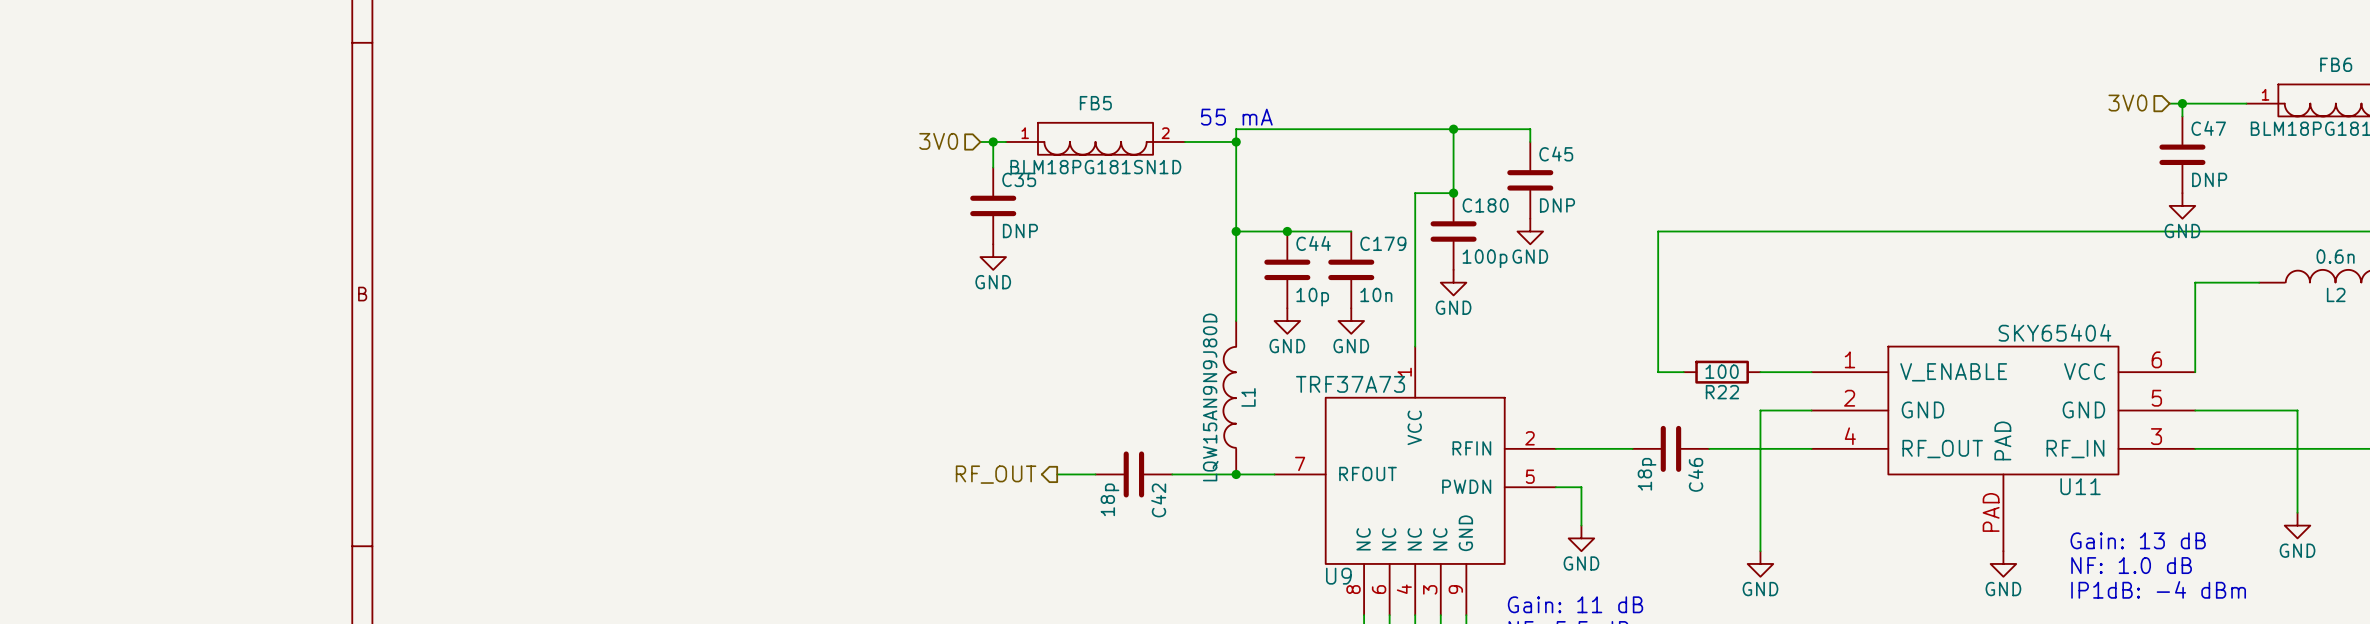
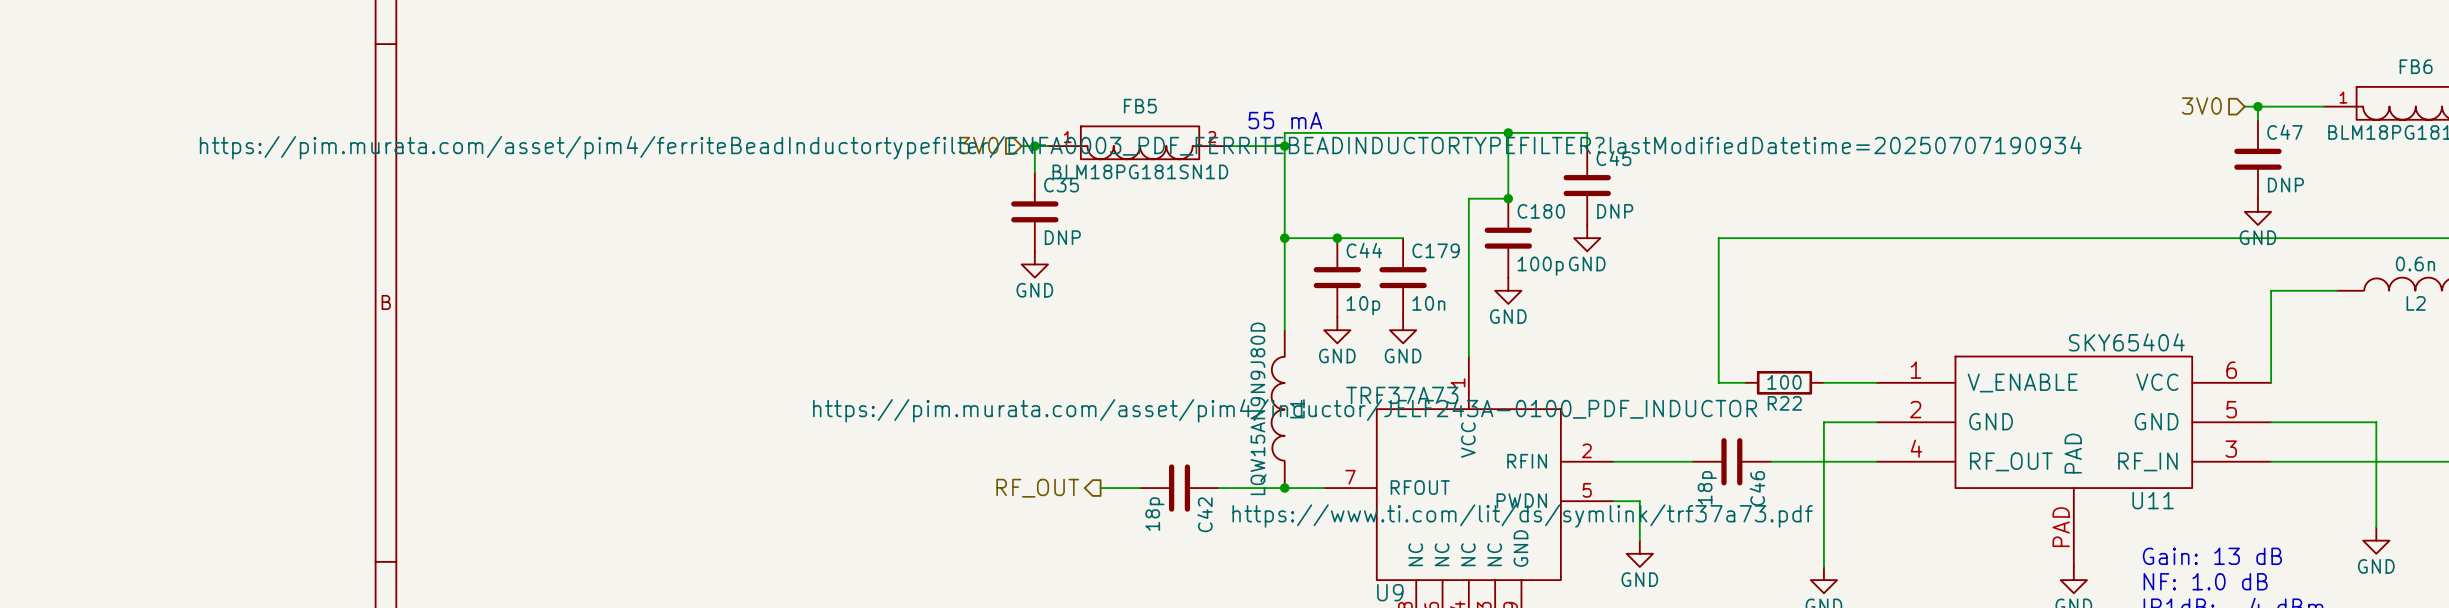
FB5 text: none -> https://pim.murata.com/asset/pim4/ferriteBeadInductortypefilter/ENFA0003_PDF_FERRITEBEADINDUCTORTYPEFILTER?lastModifiedDatetime=20250707190934 (1140, 147)
L1 text: none -> https://pim.murata.com/asset/pim4/inductor/JELF243A-0100_PDF_INDUCTOR (1285, 410)
U9 text: none -> https://www.ti.com/lit/ds/symlink/trf37a73.pdf (1522, 516)

